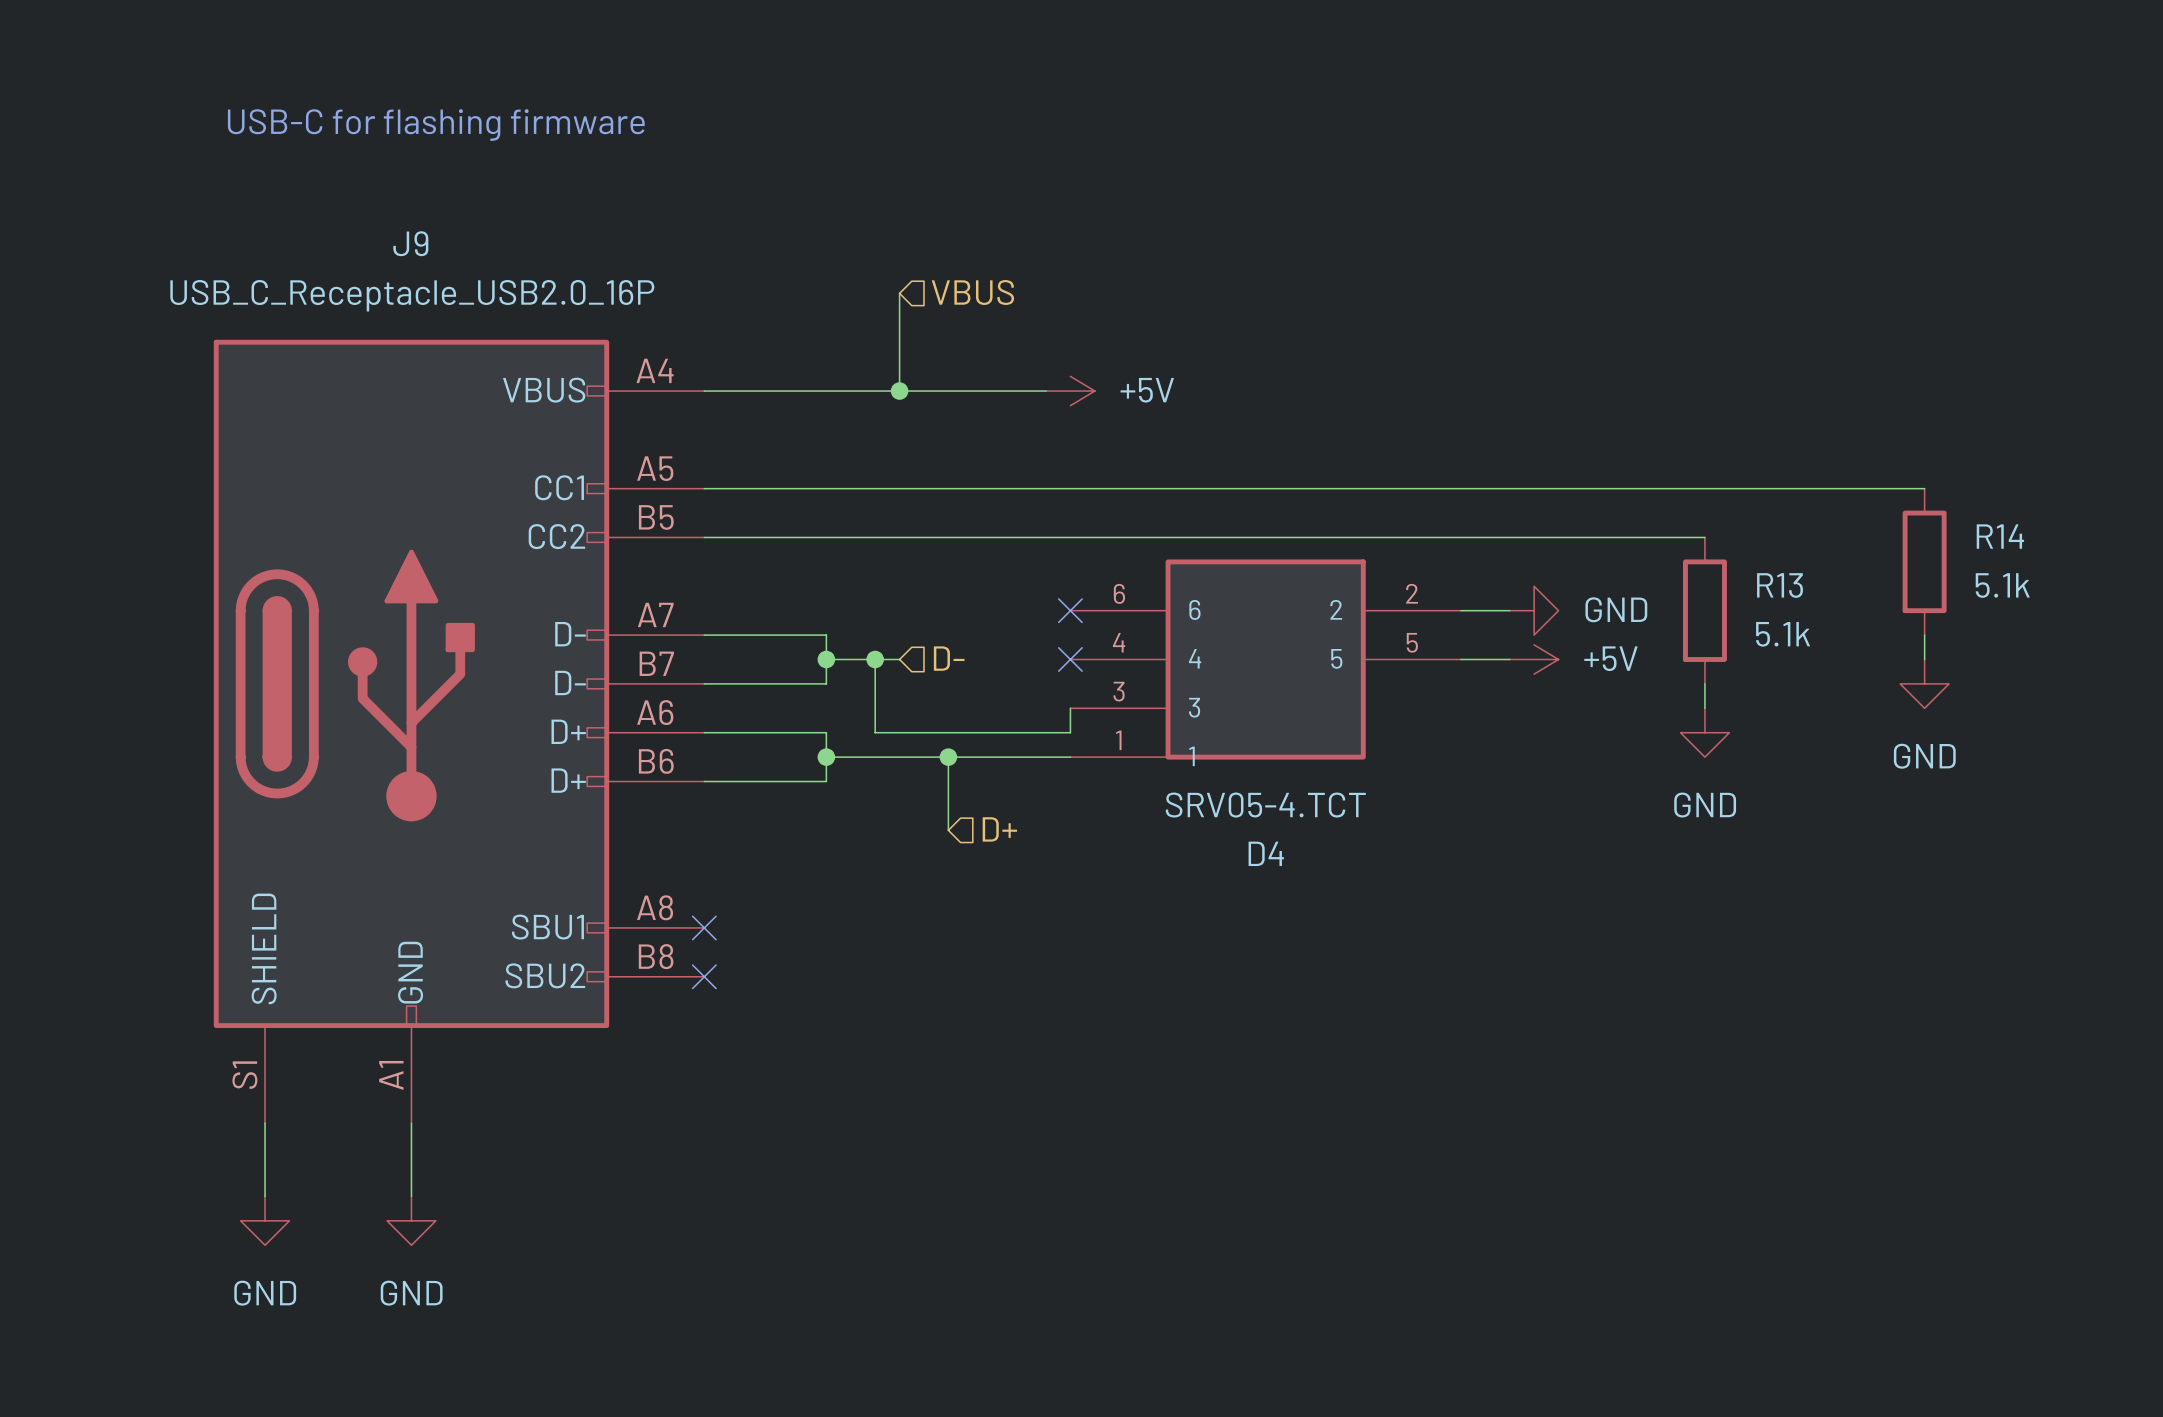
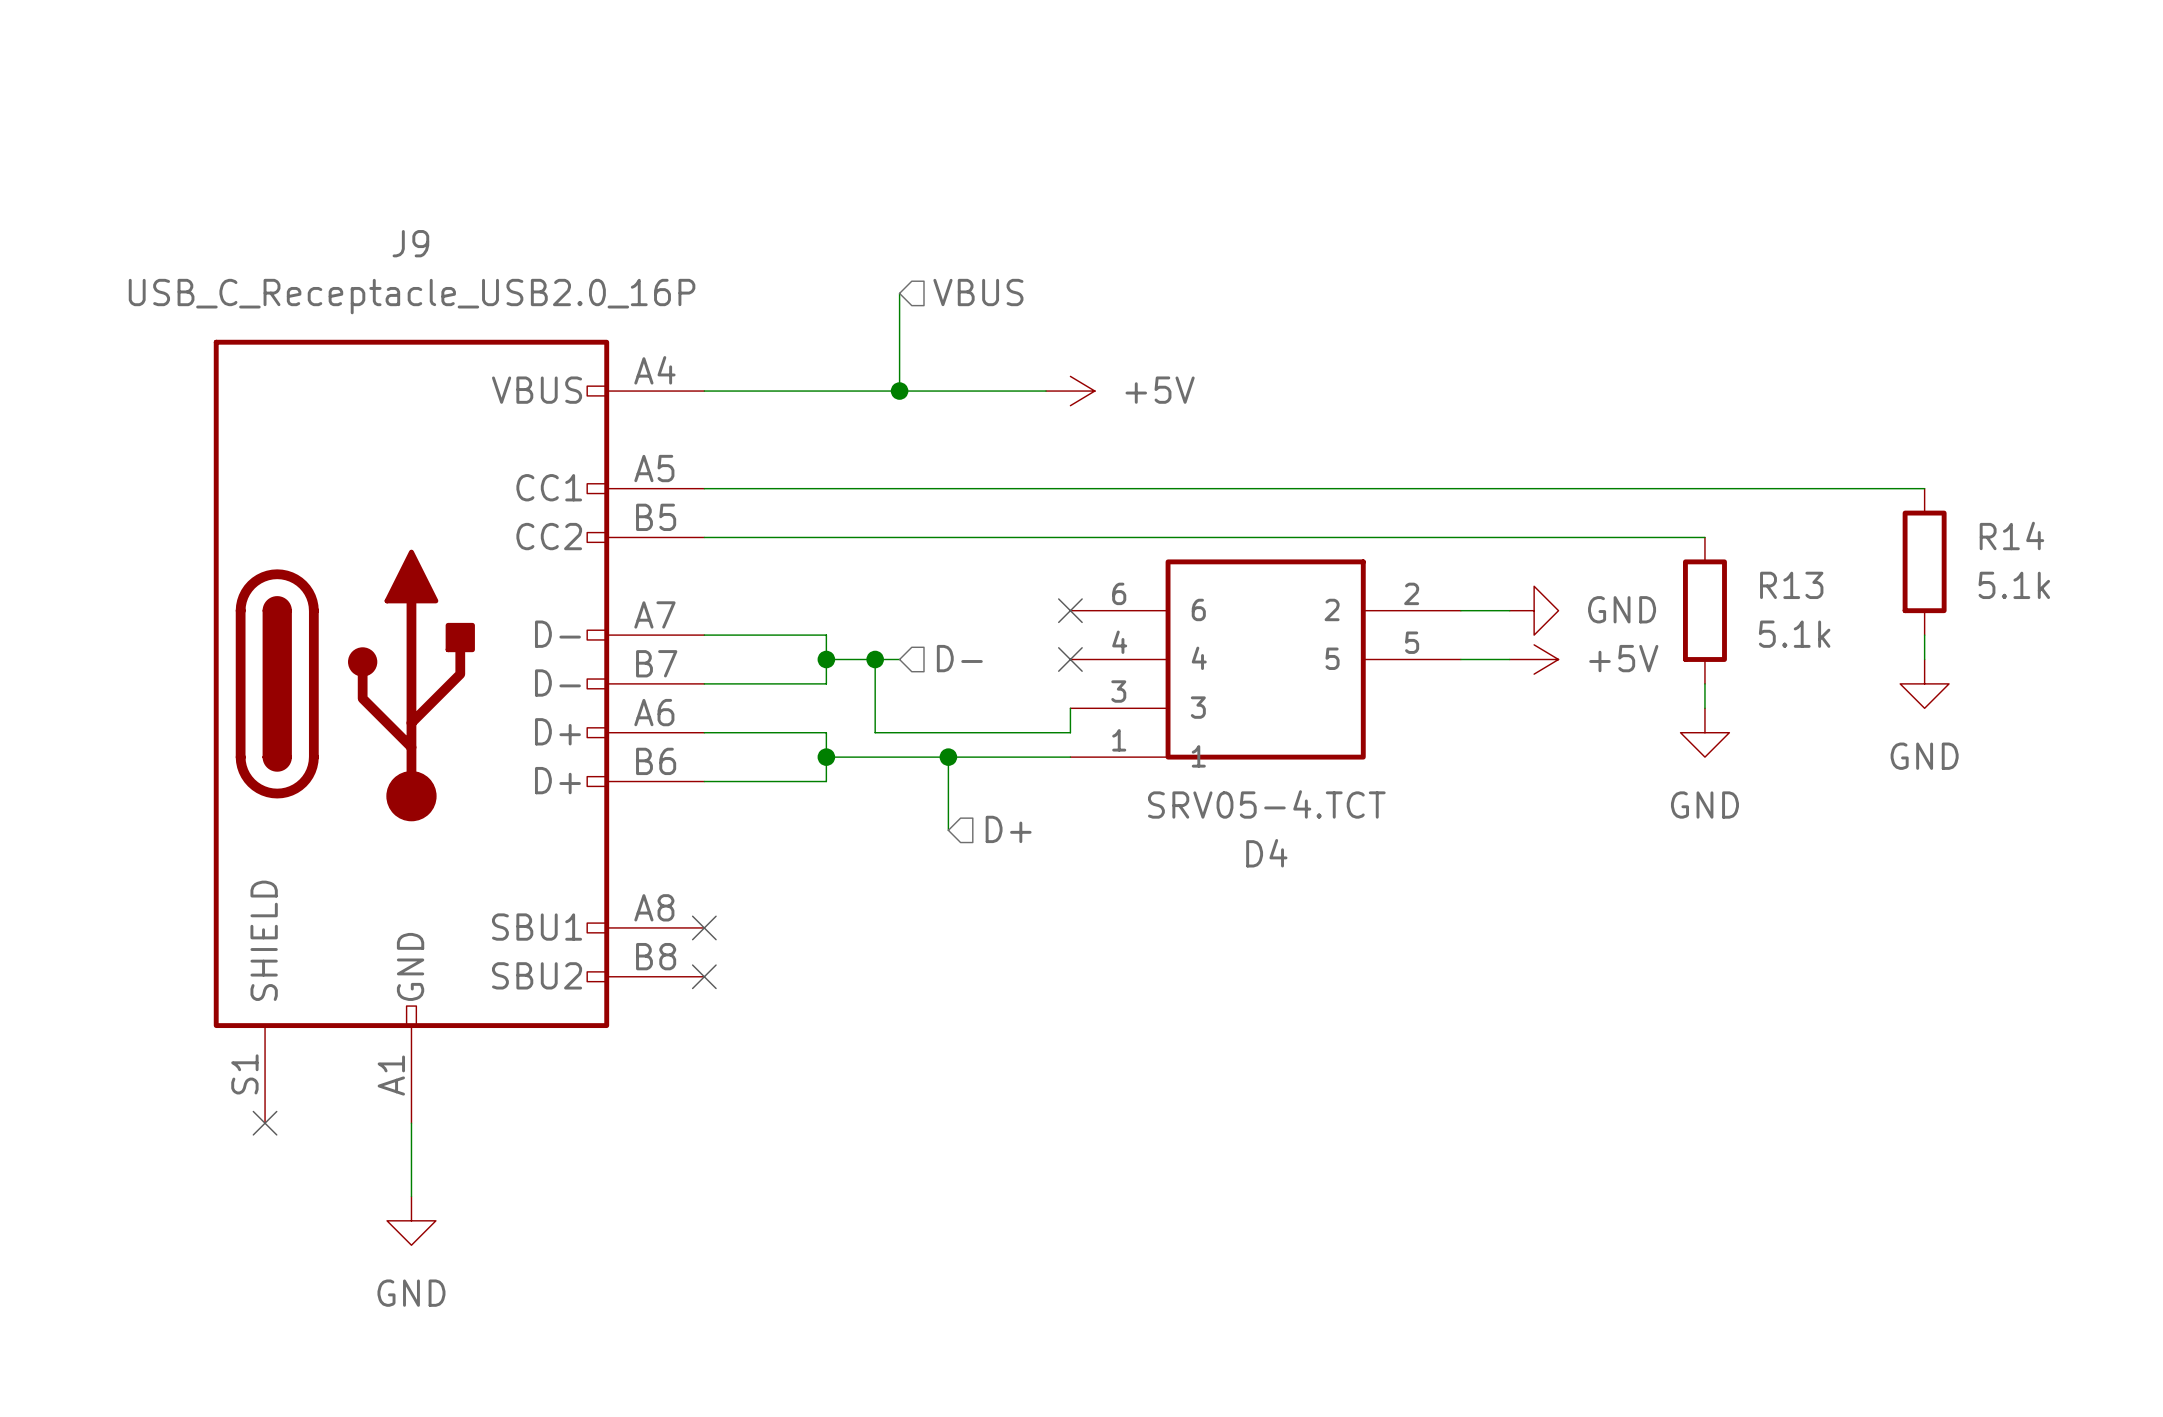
text: USB-C for flashing firmware (436, 125) -> none
wire: (265, 1123) (265, 1196) -> none
no-connect mark: none -> (265, 1123)
power symbol: GND (265, 1220) -> none

